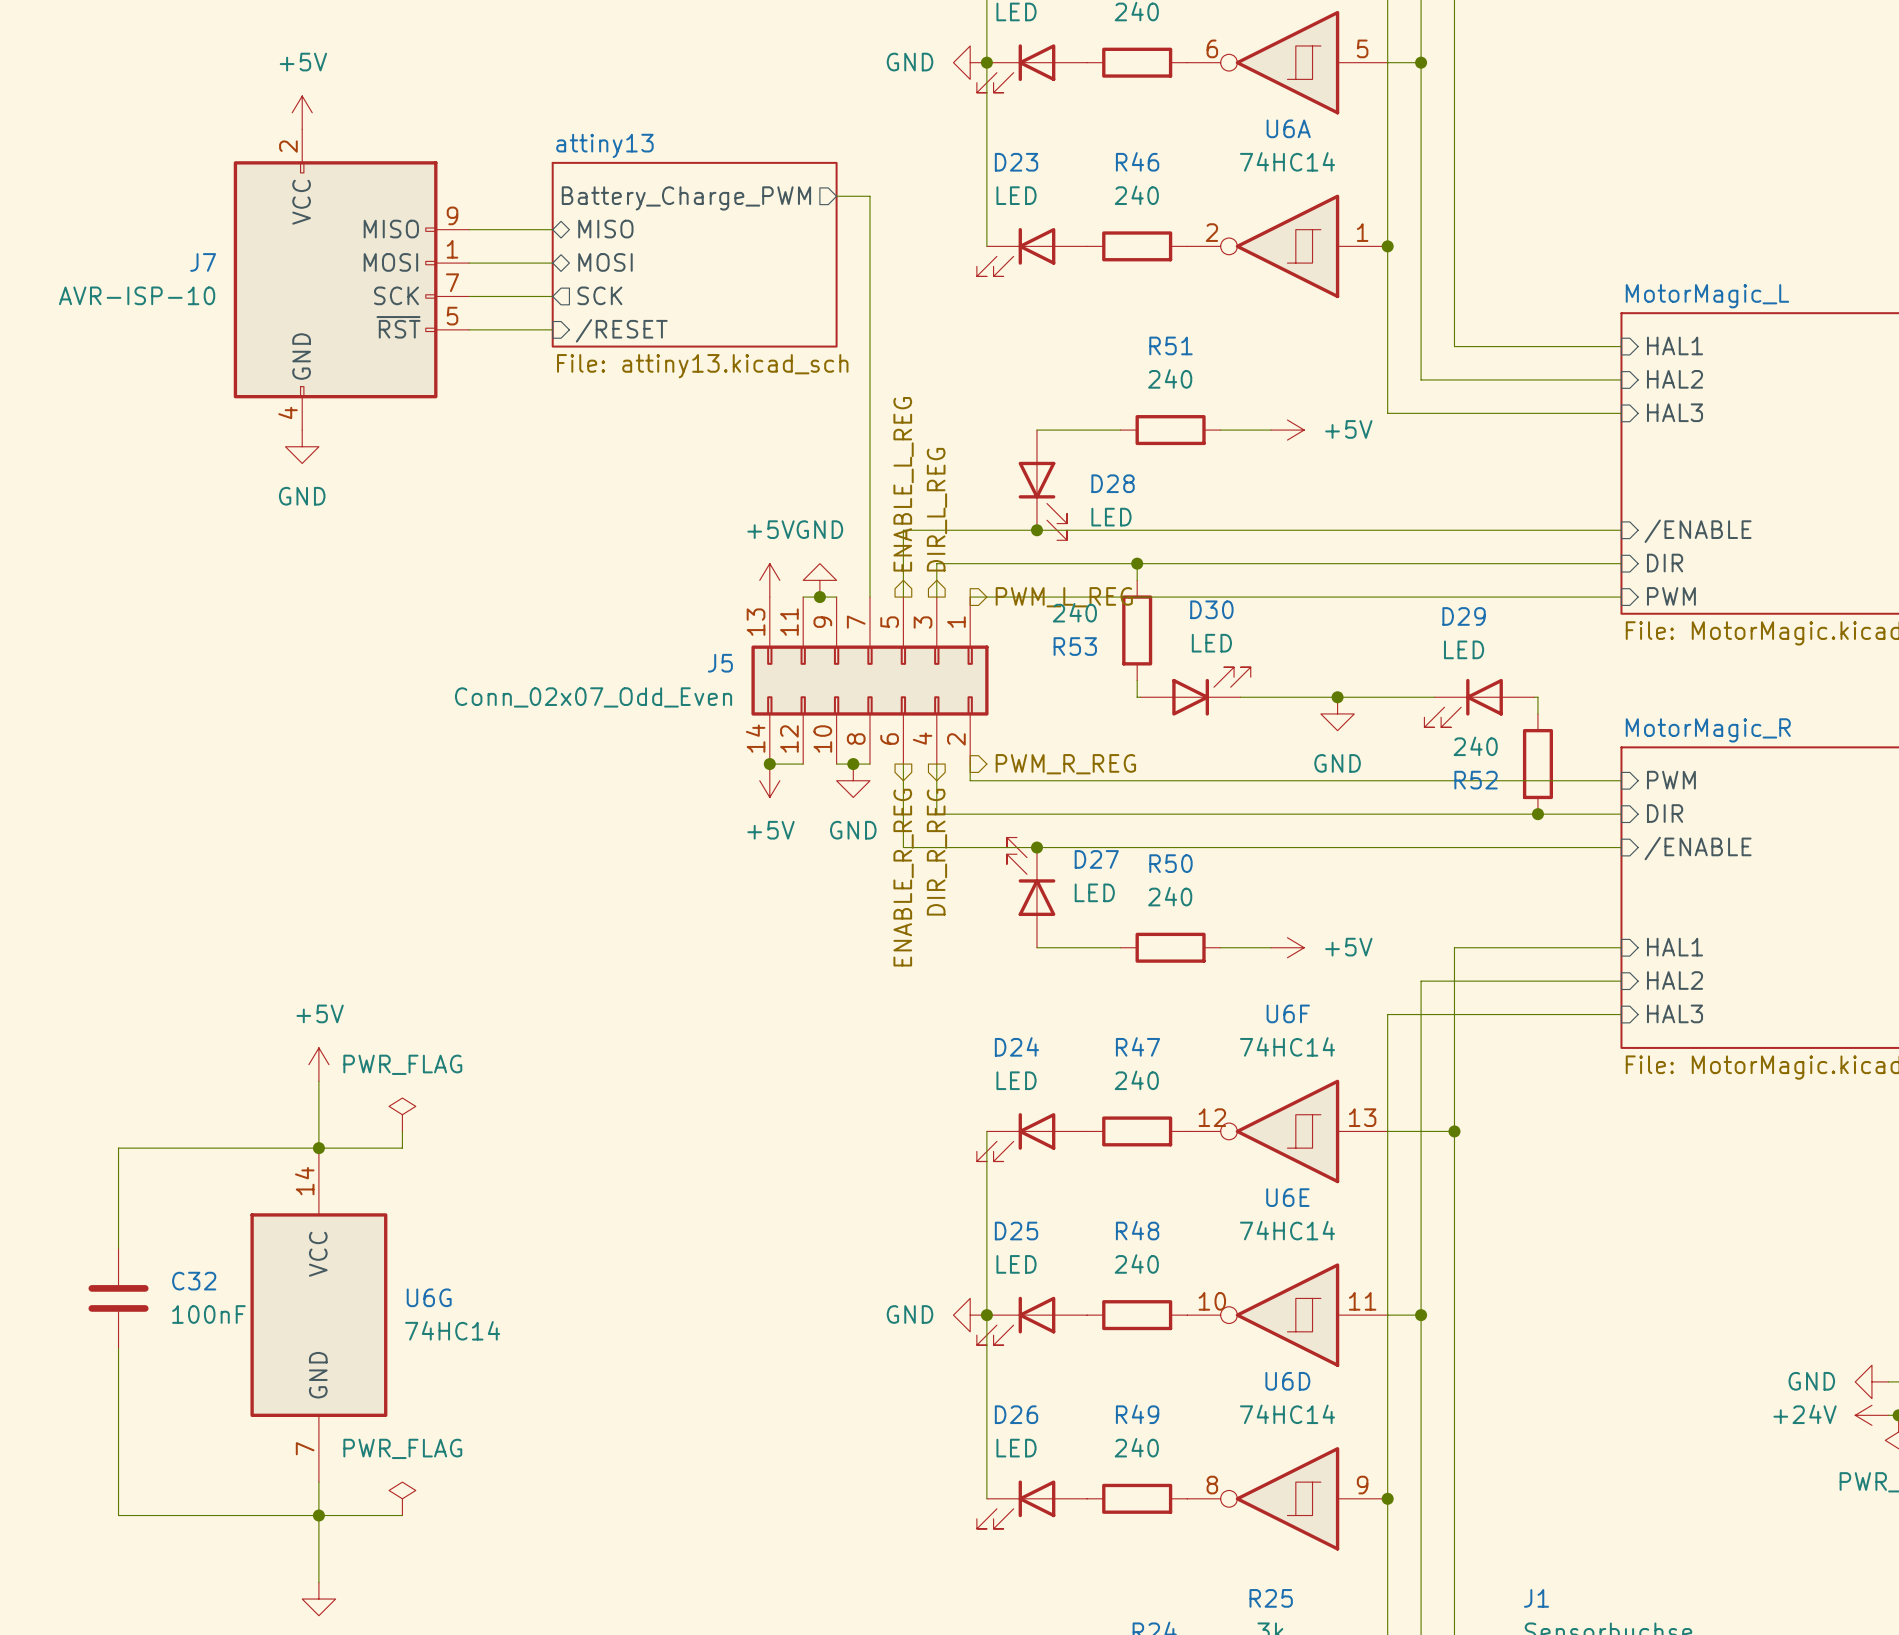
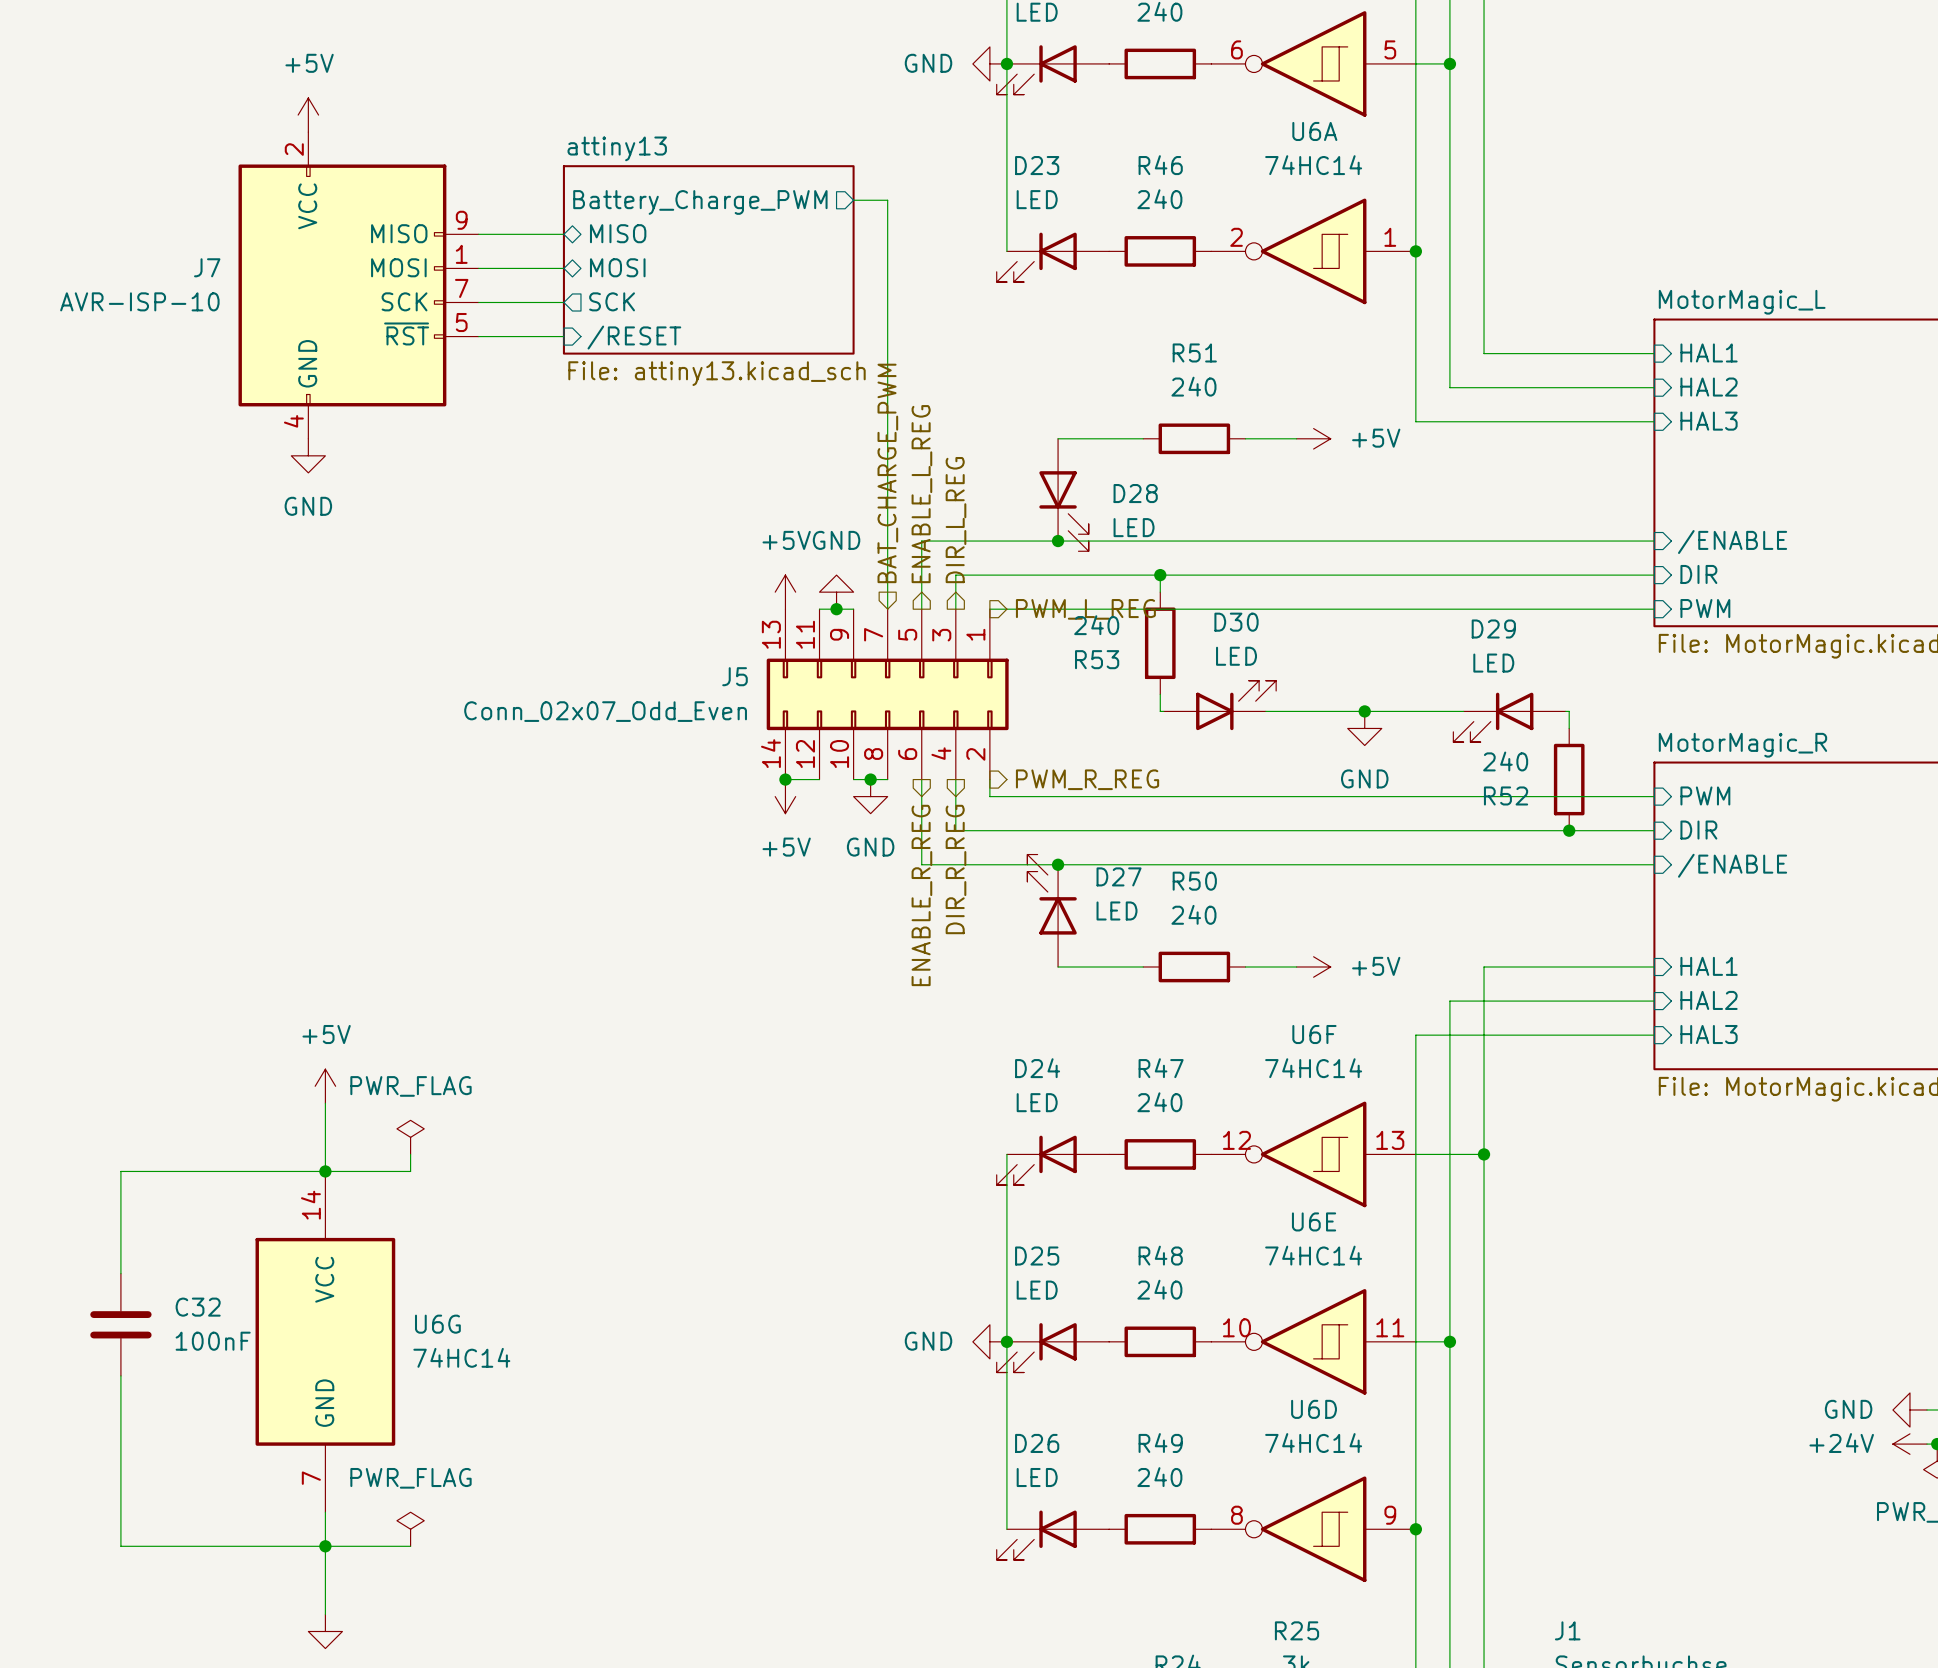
hierarchical label: none -> BAT_CHARGE_PWM (887, 473)

